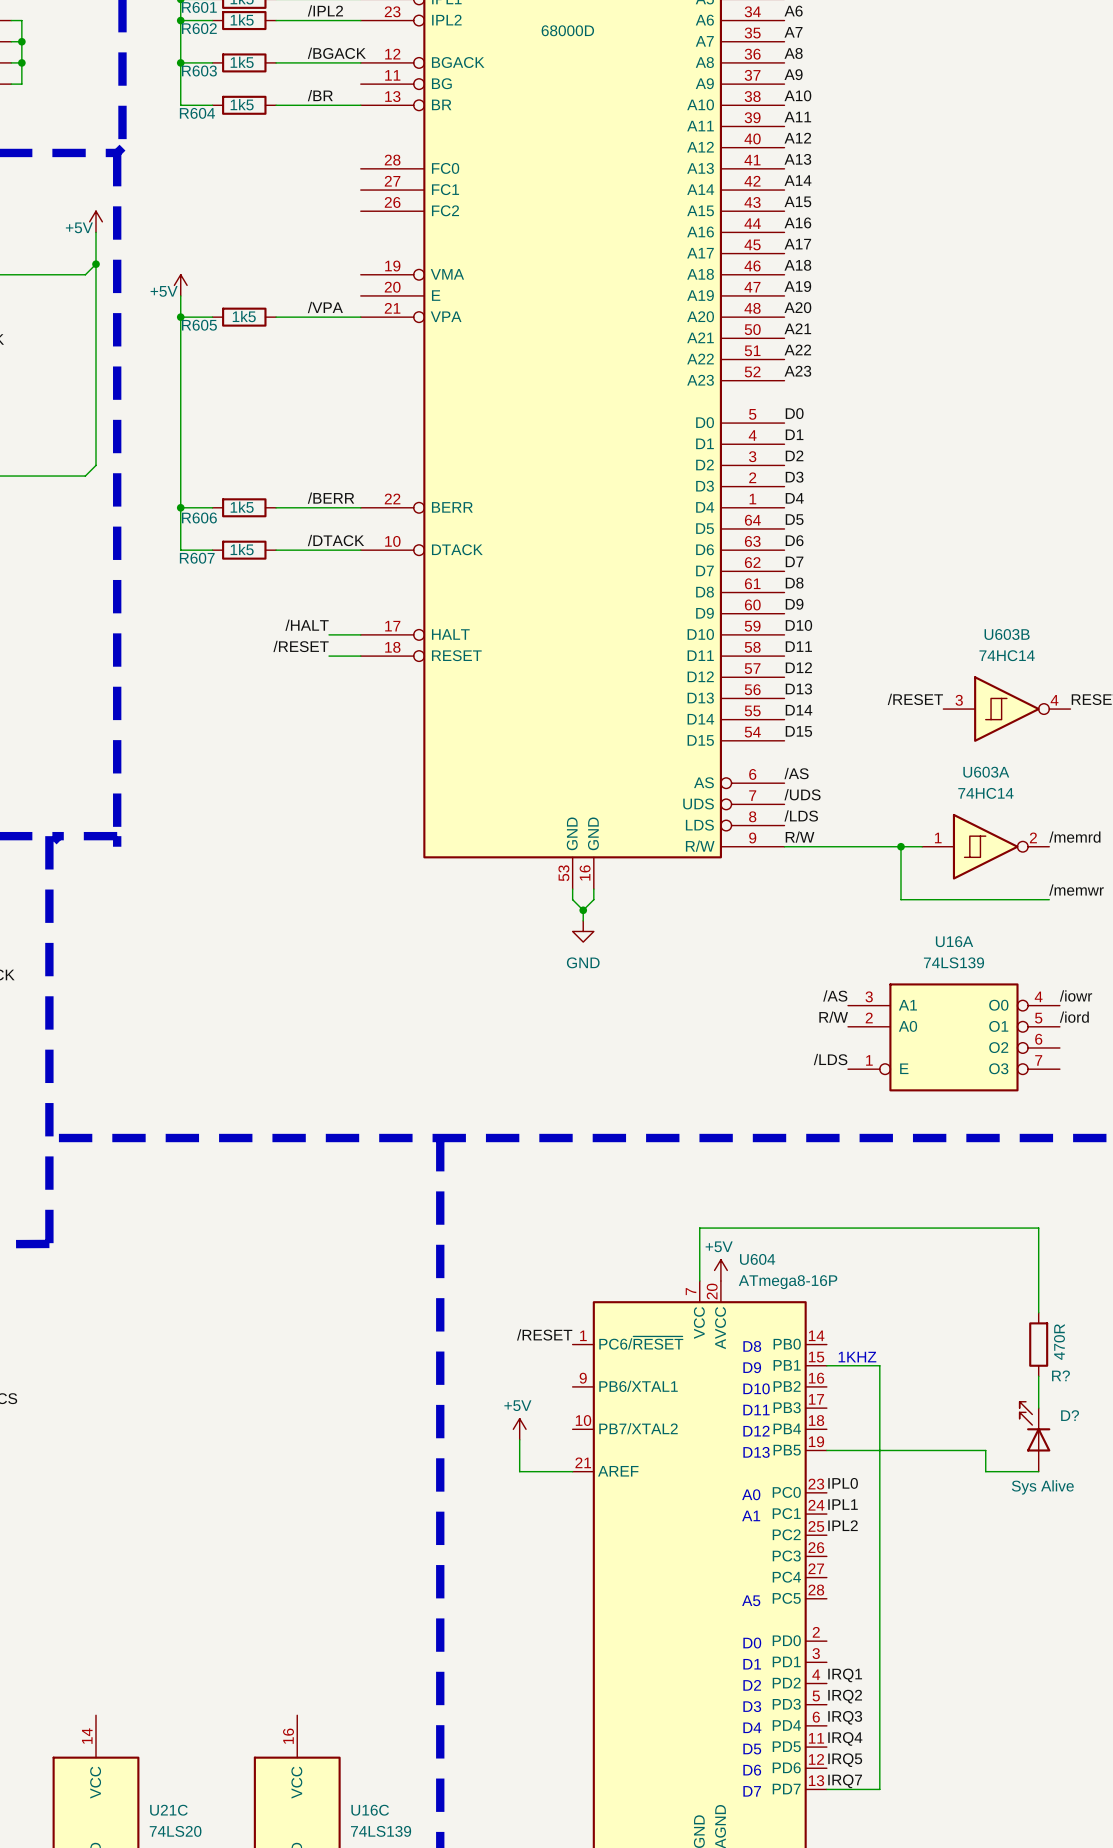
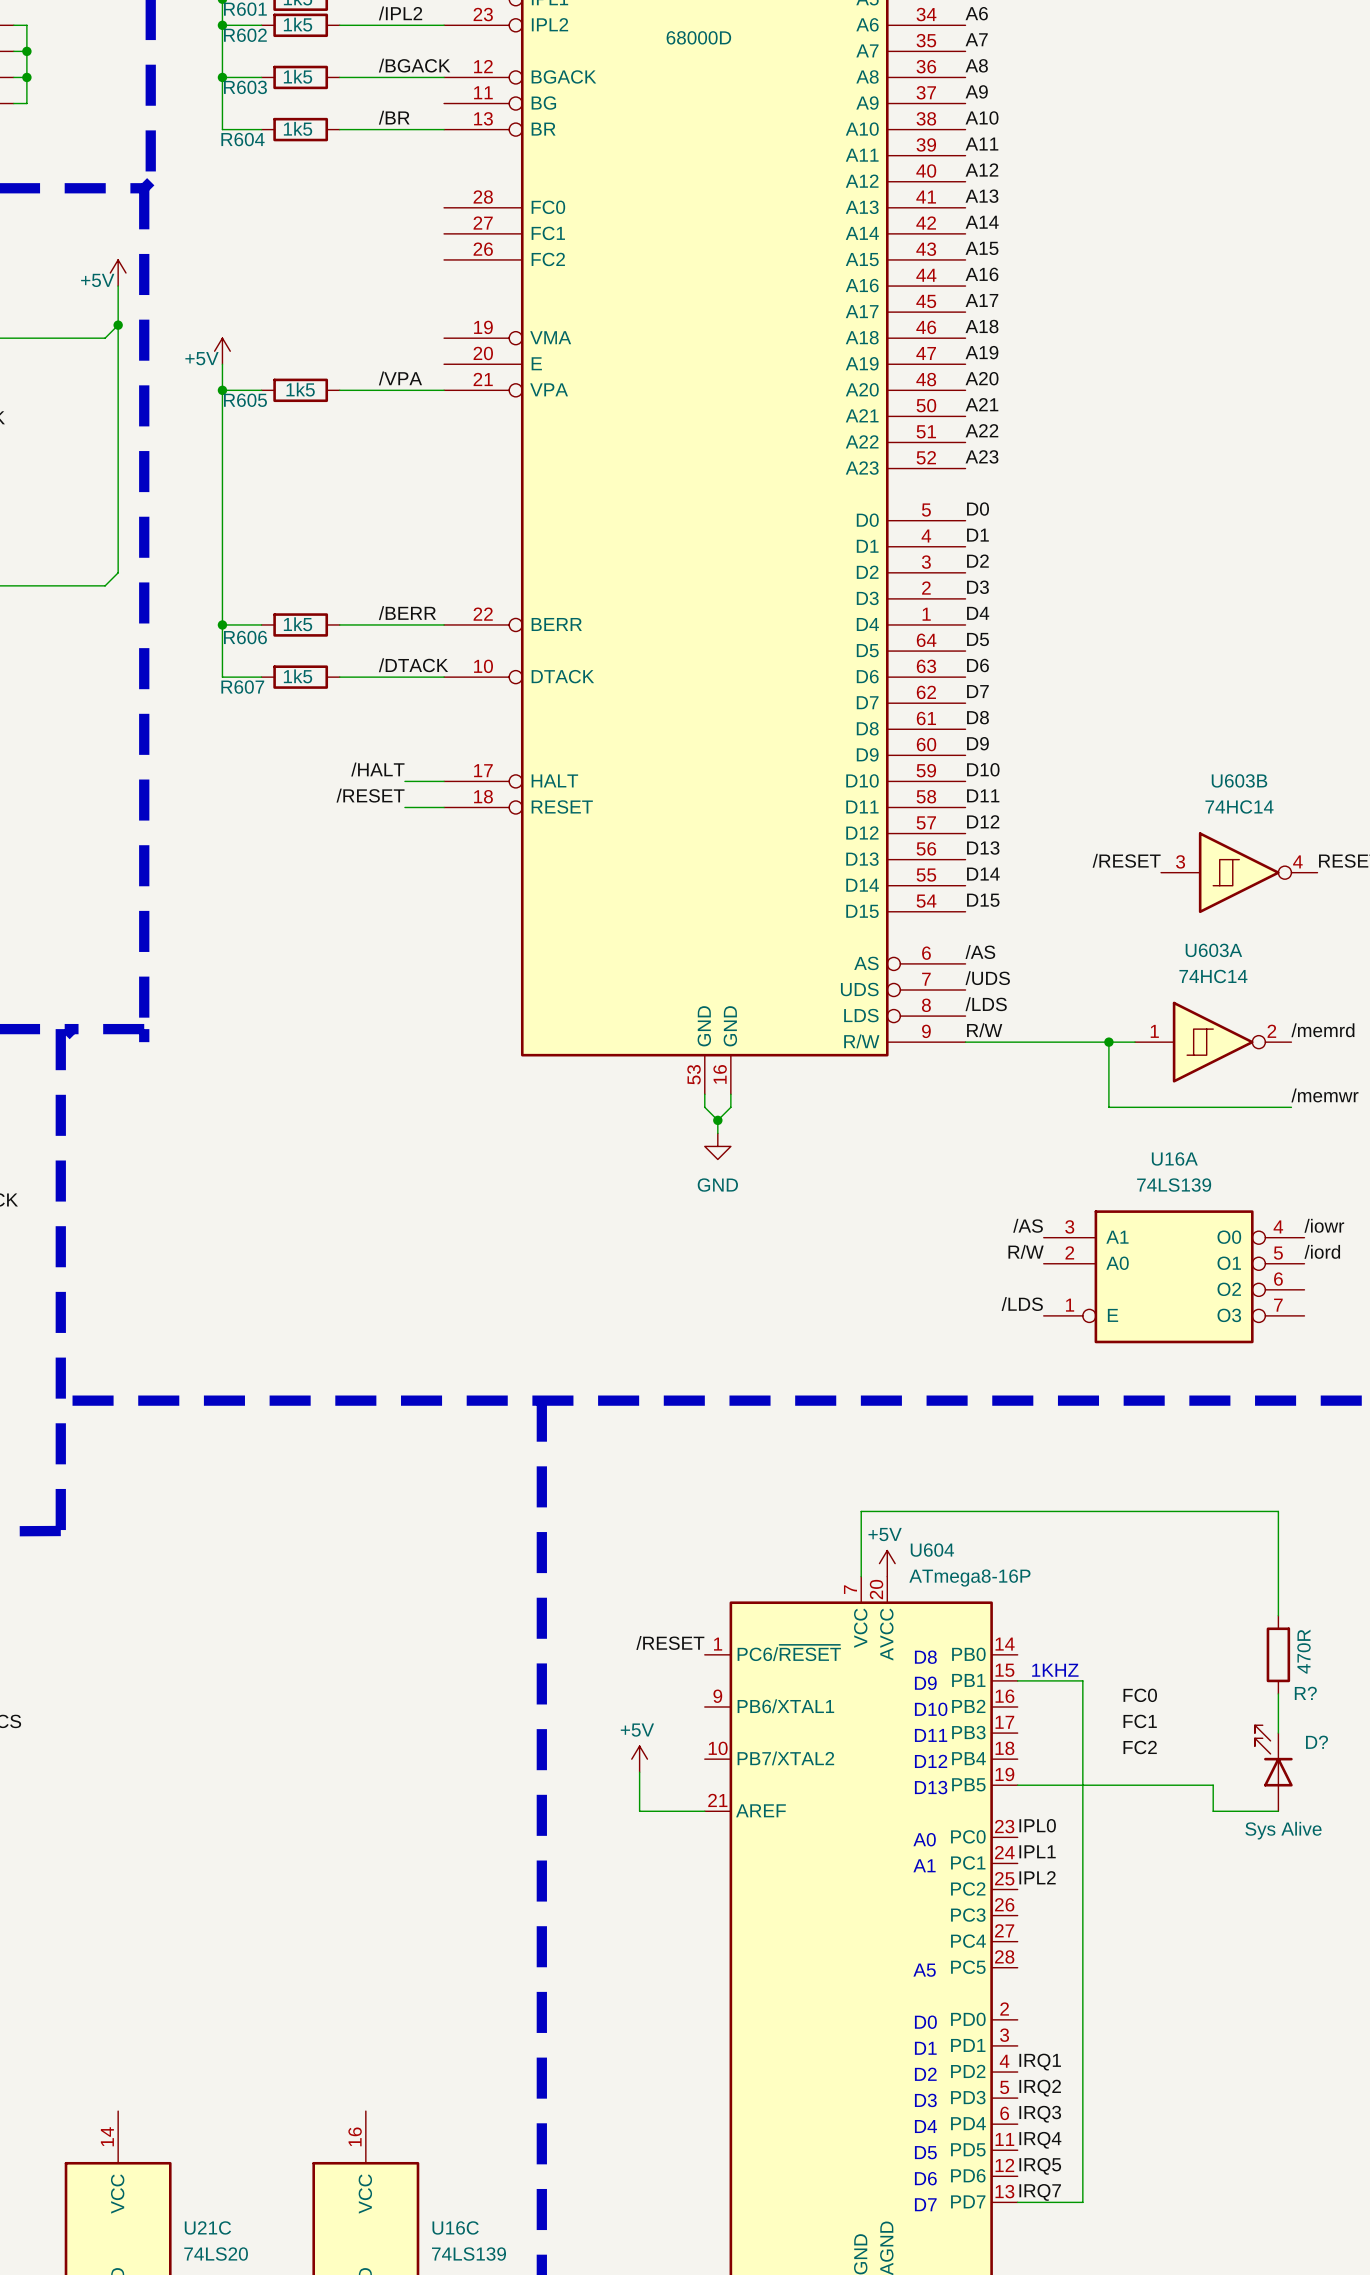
label: none -> FC0 (1140, 1695)
label: none -> FC1 (1140, 1721)
label: none -> FC2 (1140, 1747)

